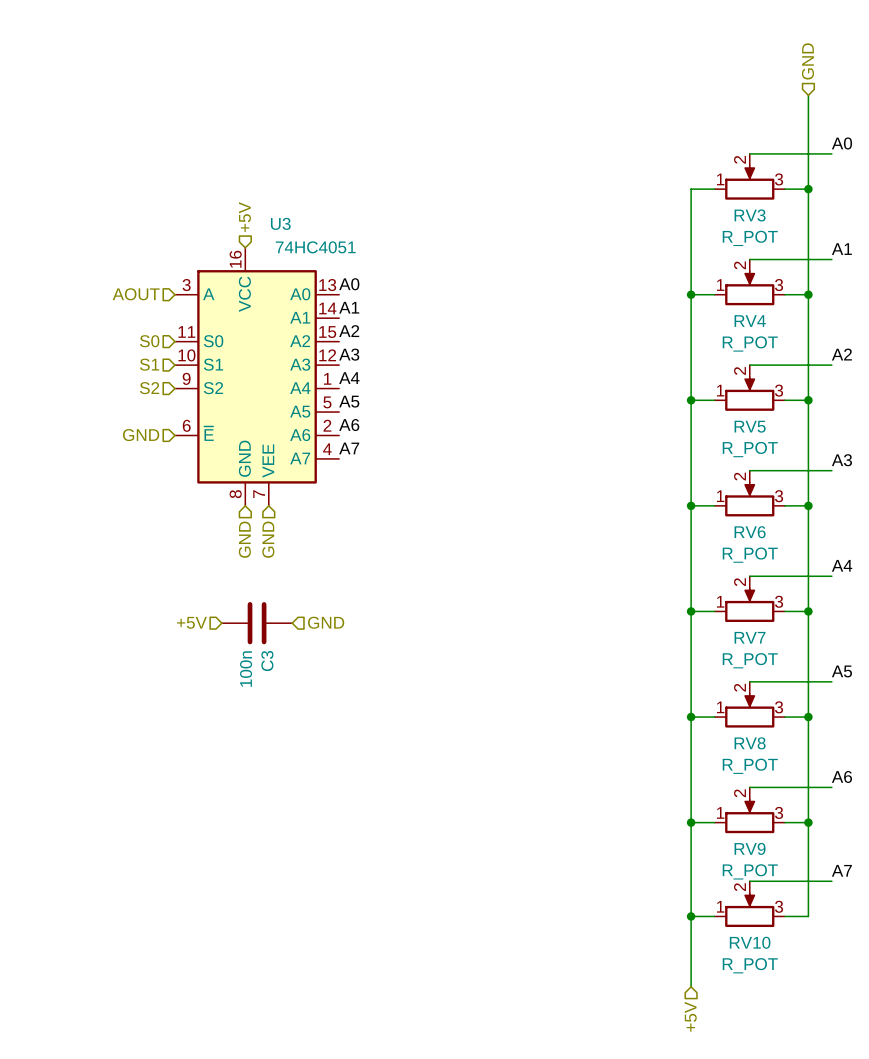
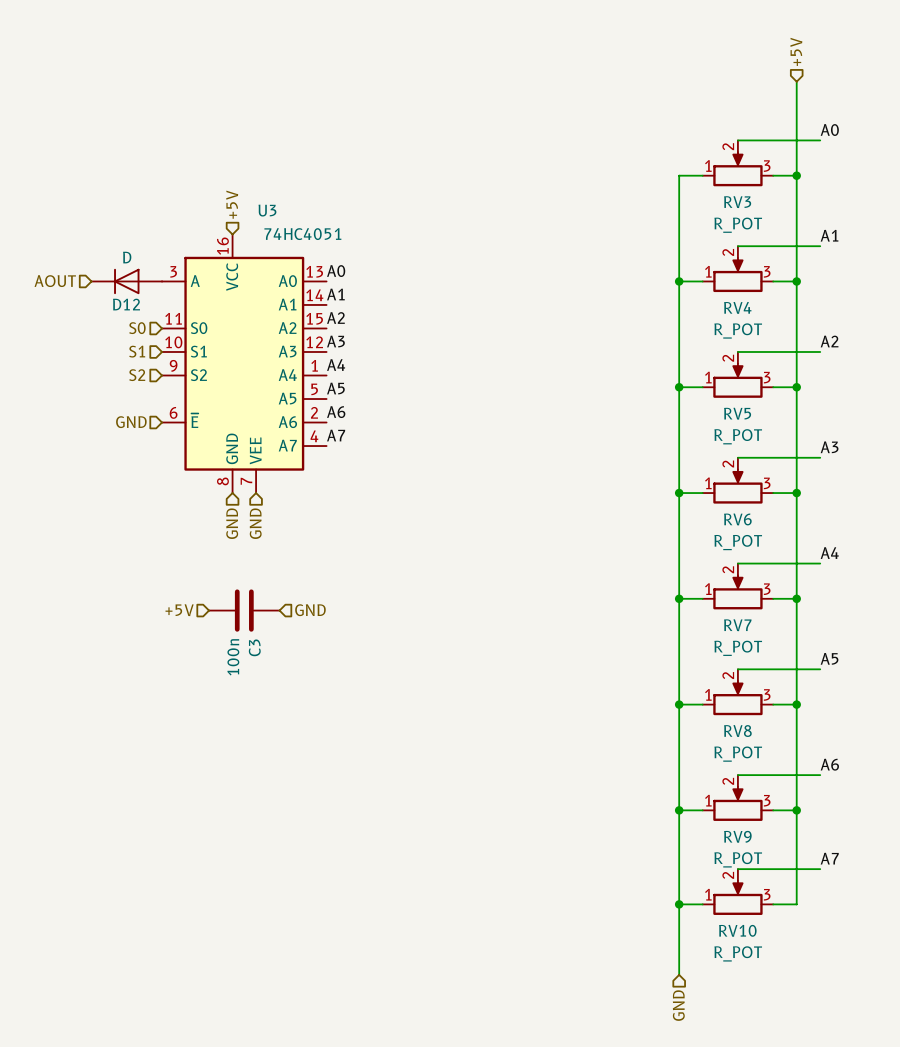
hierarchical label: GND (807, 61) -> +5V (796, 51)
hierarchical label position: AOUT (136, 294) -> AOUT (55, 281)
D12: none -> D (126, 281)
hierarchical label: +5V (690, 1016) -> GND (678, 1005)

